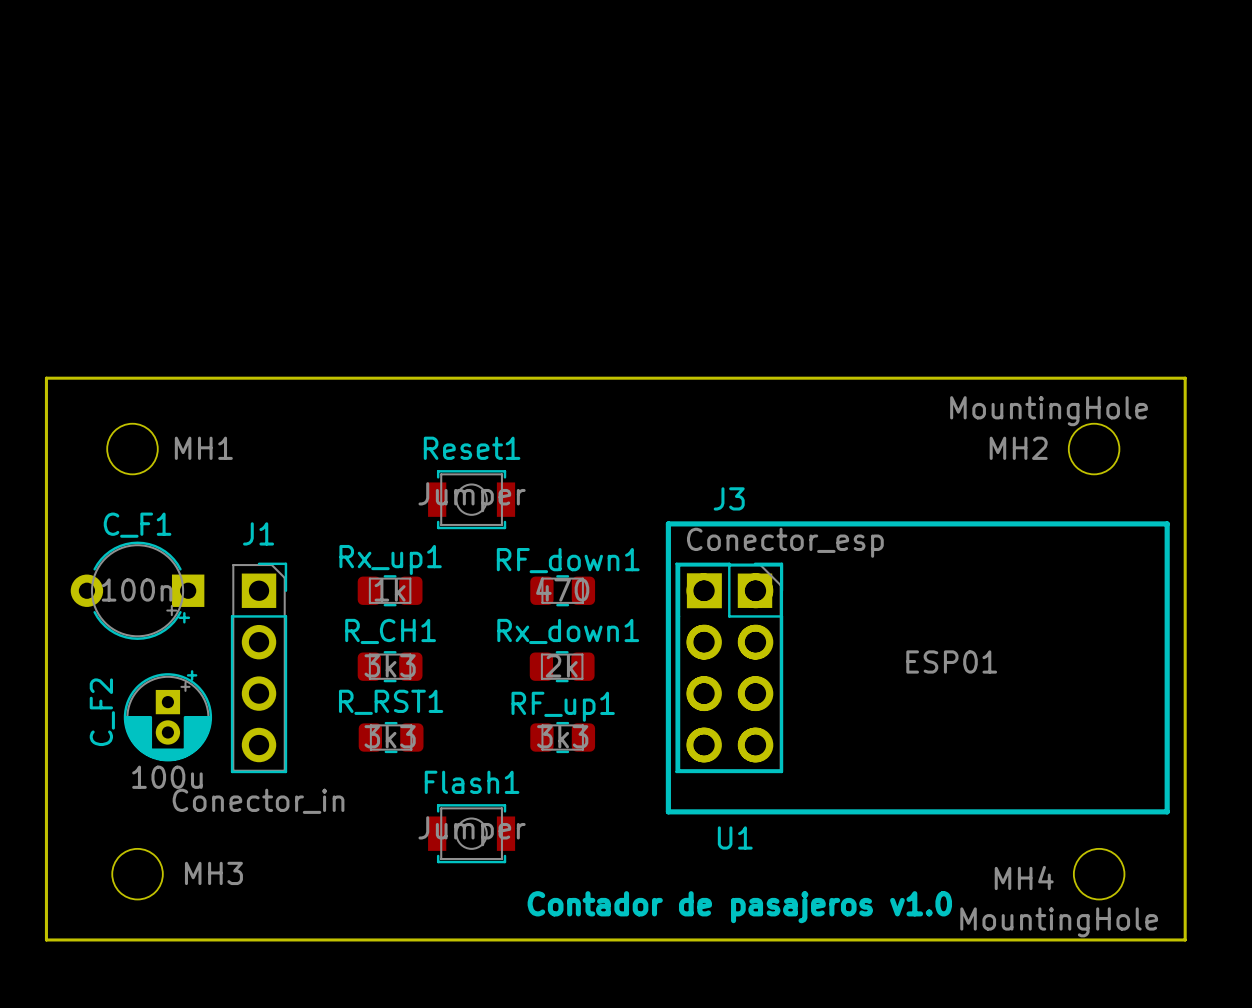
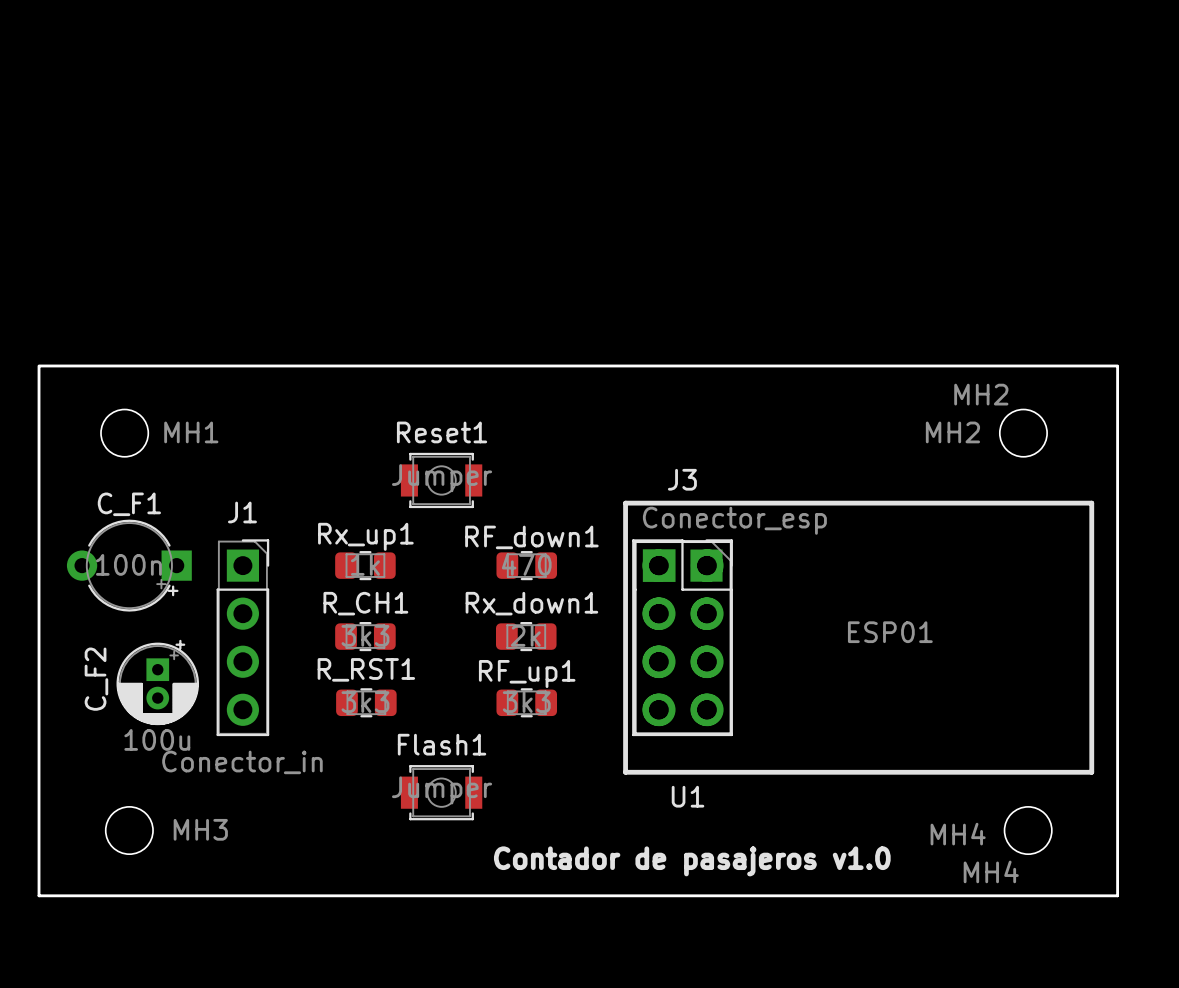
board edge: none -> (39, 365) (1117, 365)
board edge: none -> (39, 366) (39, 895) (1117, 895) (1117, 366)
board edge: (46, 378) (1185, 378) (1185, 939) (46, 939) (46, 378) -> none
MH2 value: MountingHole (1049, 411) -> MH2 (981, 394)
MH4 value: MountingHole (1059, 922) -> MH4 (991, 871)

